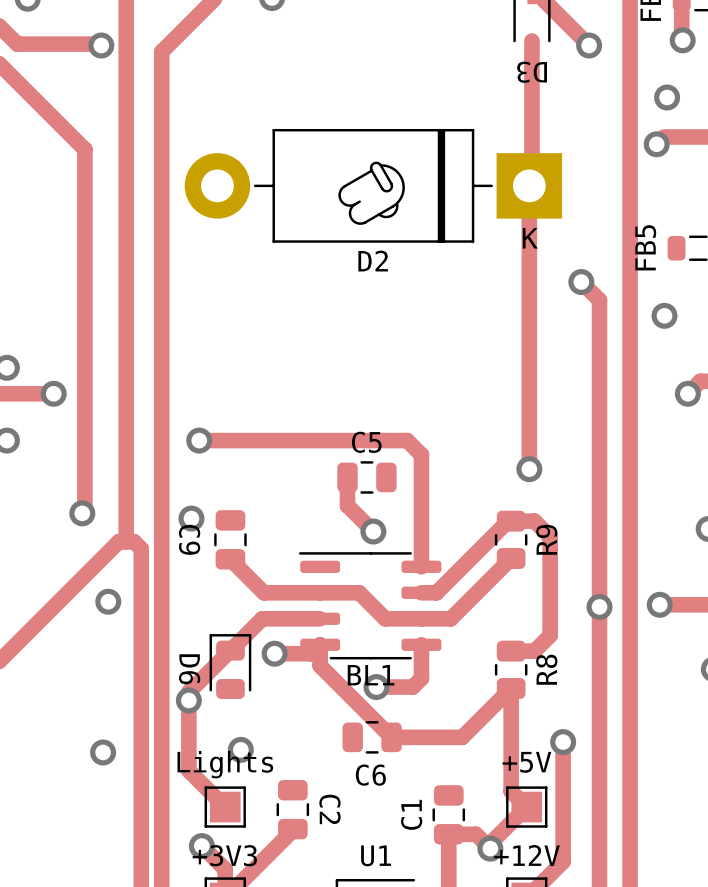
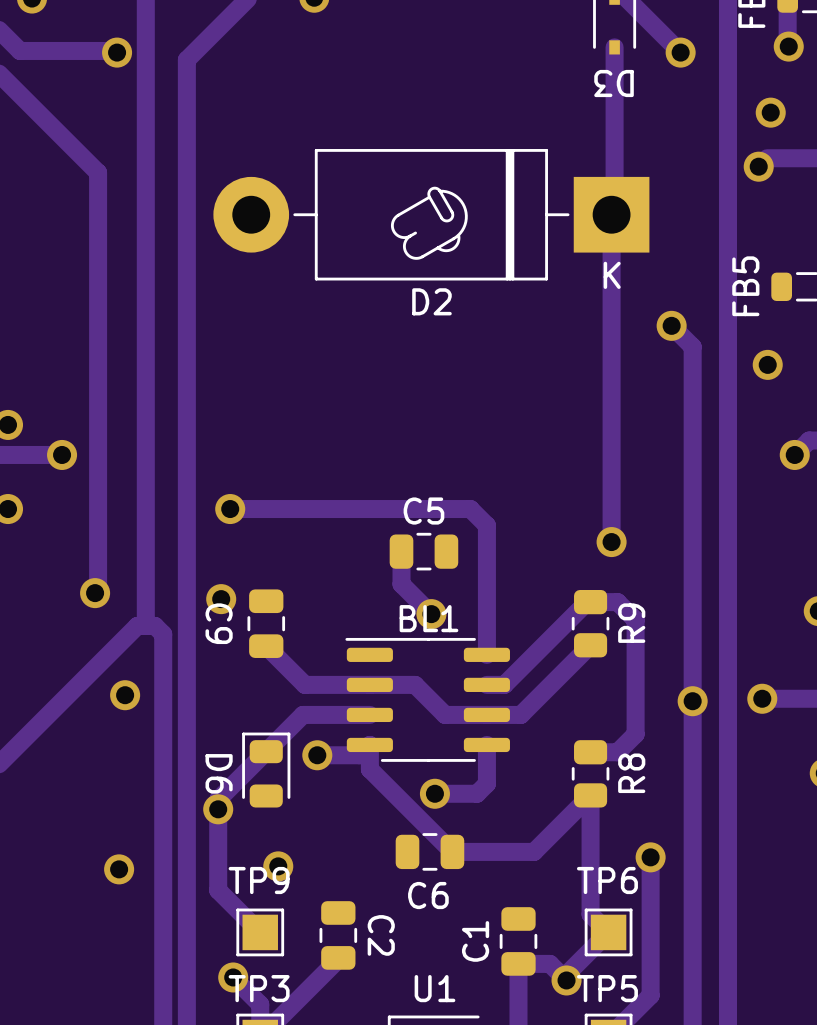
BL1 name position: BL1 (370, 675) -> BL1 (428, 618)
+5V name: +5V (526, 762) -> TP6 (607, 880)
Lights name: Lights (225, 764) -> TP9 (259, 880)
+3V3 name: +3V3 (224, 855) -> TP3 (259, 988)
+12V name: +12V (526, 855) -> TP5 (607, 988)

